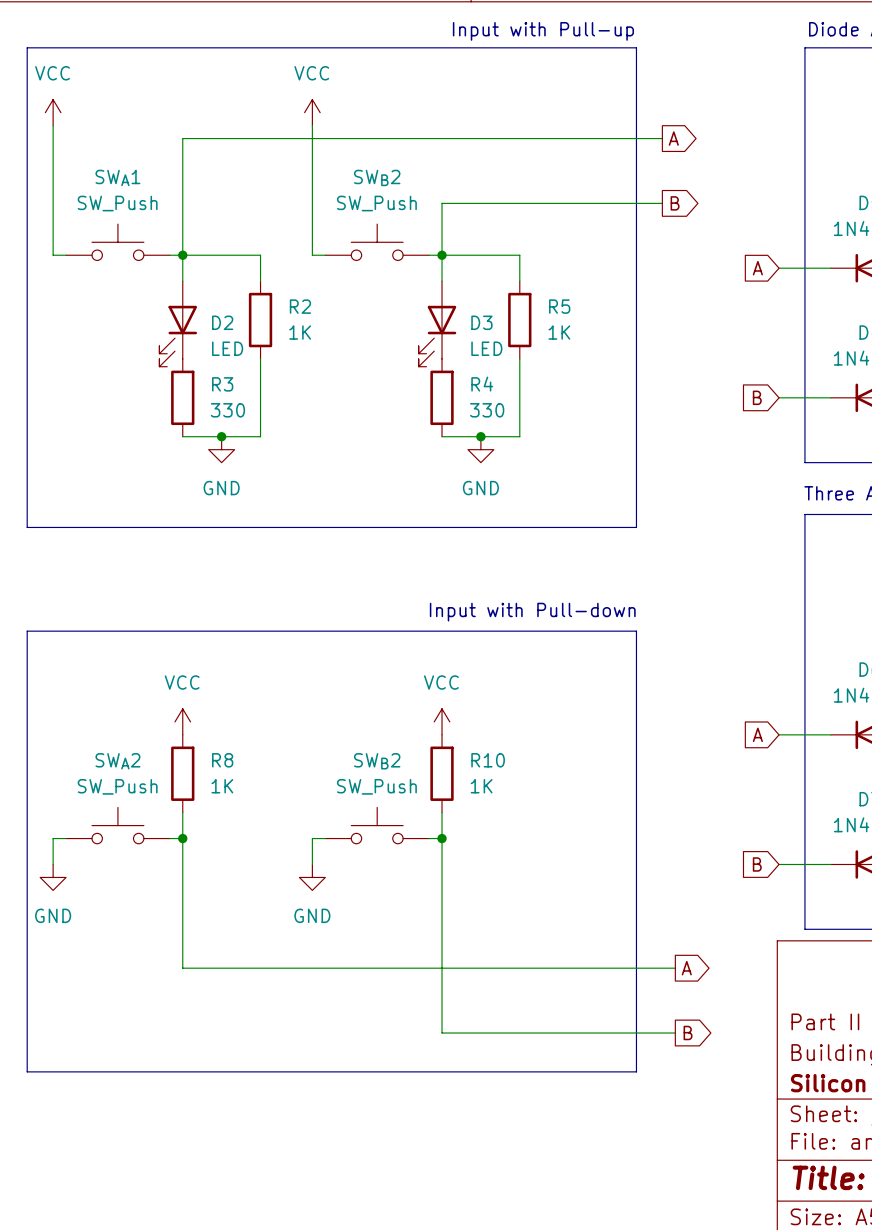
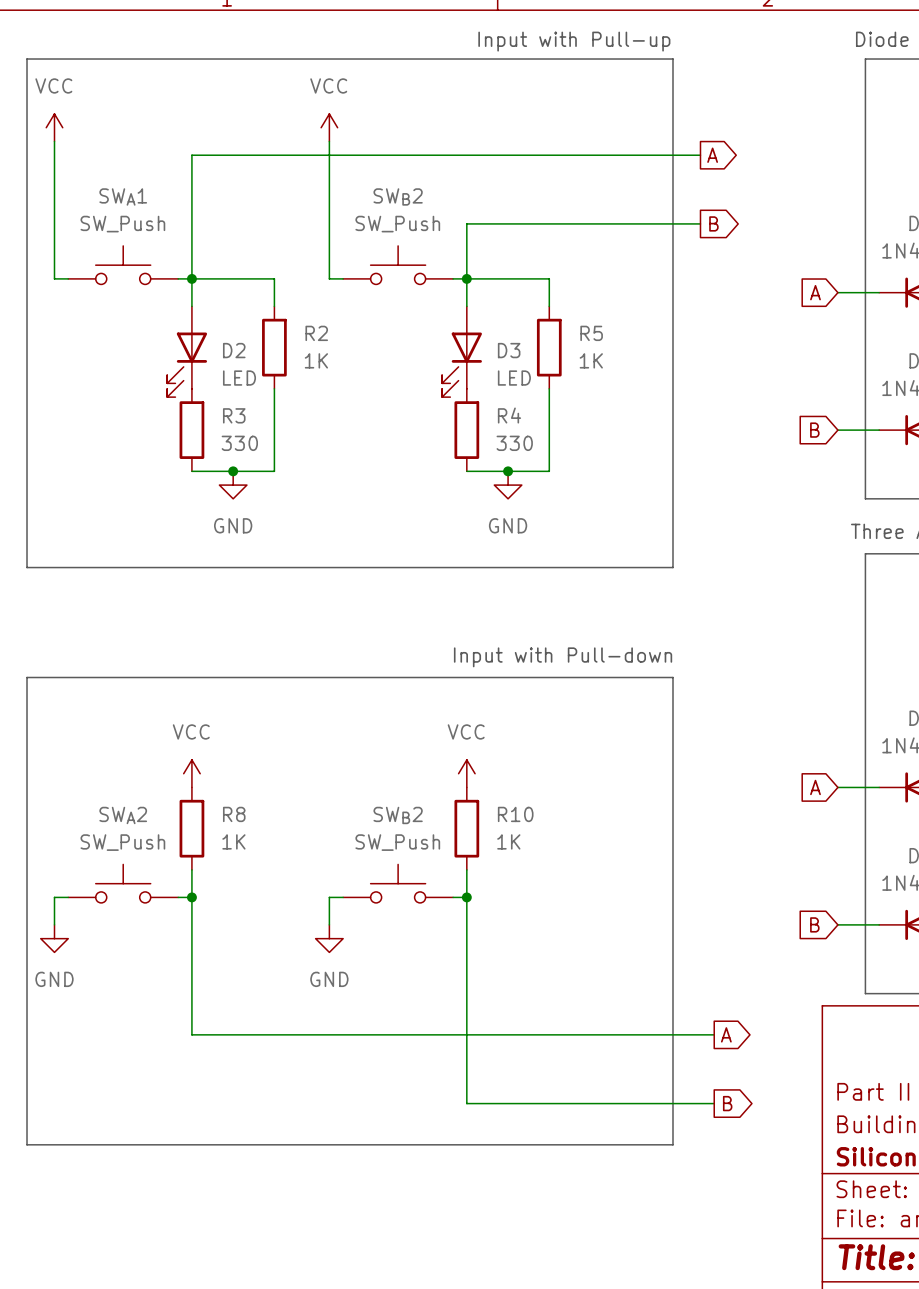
line: (817, 47) (804, 47) (804, 462) (817, 462) -> (865, 59) (865, 498)
global label position: A (757, 268) -> A (815, 292)
wire: (779, 268) (792, 268) -> none
global label position: B (757, 397) -> B (814, 430)
wire: (779, 397) (792, 397) -> none
line: (817, 514) (804, 514) (804, 929) (817, 929) -> (865, 553) (865, 993)
global label position: A (757, 734) -> A (815, 787)
wire: (779, 734) (792, 734) -> none
global label position: B (757, 864) -> B (814, 924)
wire: (779, 864) (792, 864) -> none

